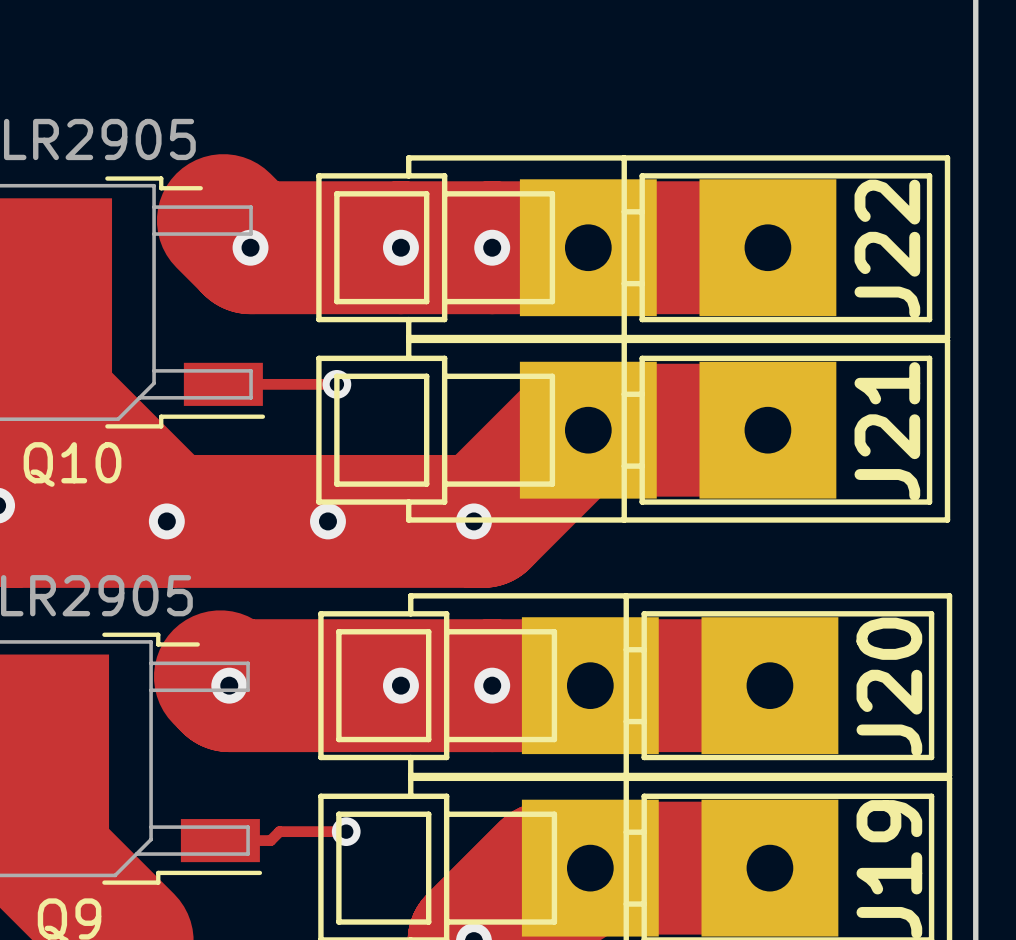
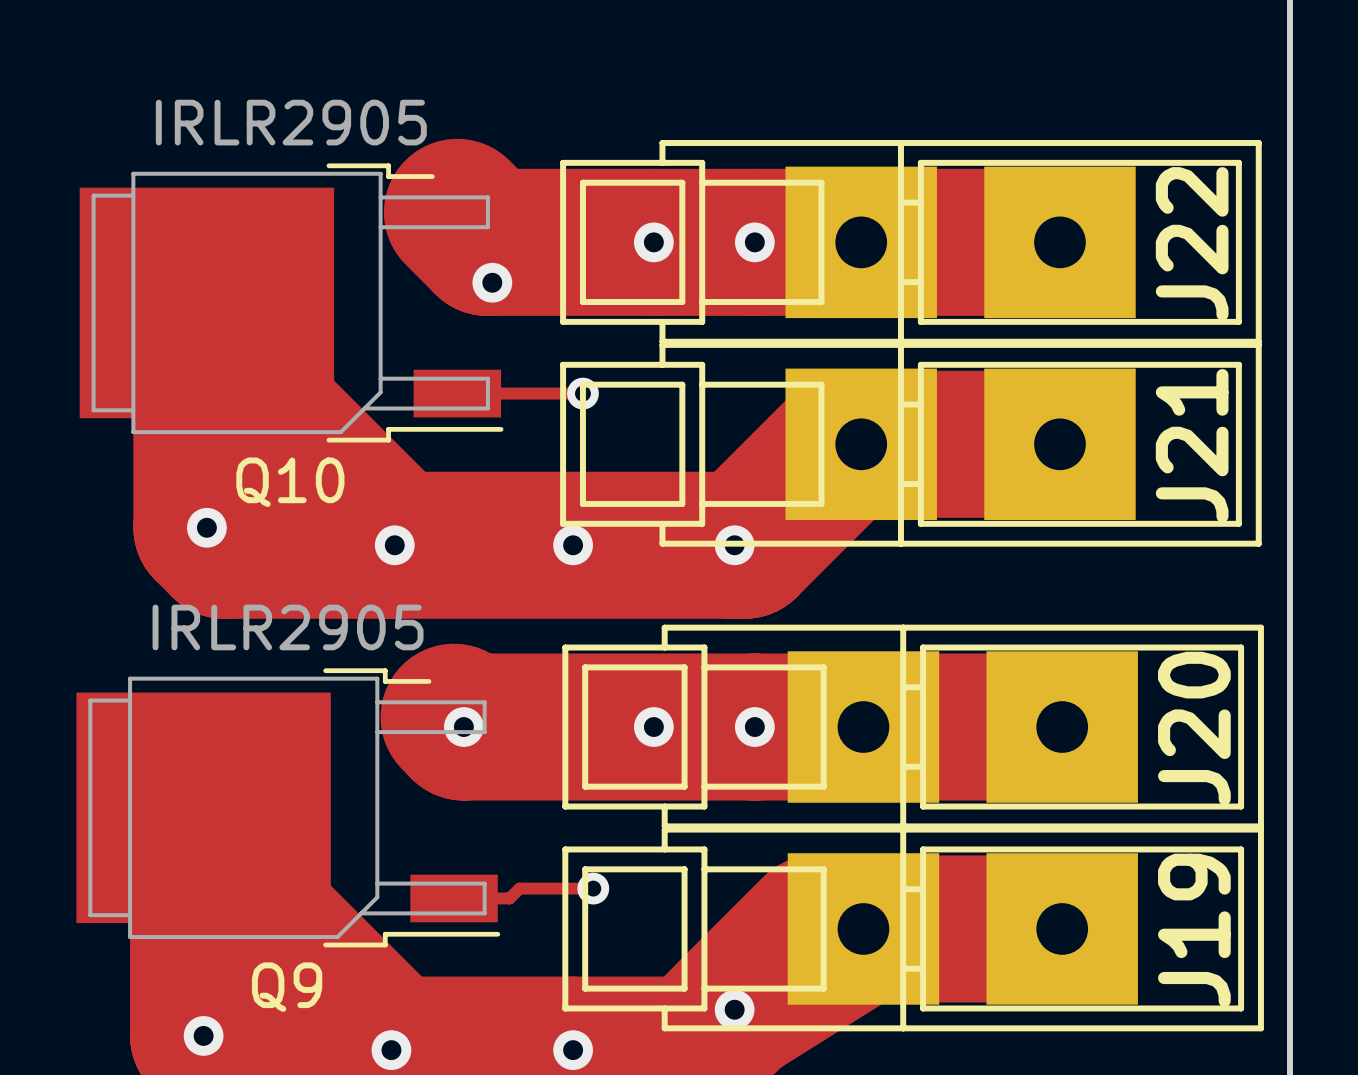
via position: (250, 247) -> (492, 282)

